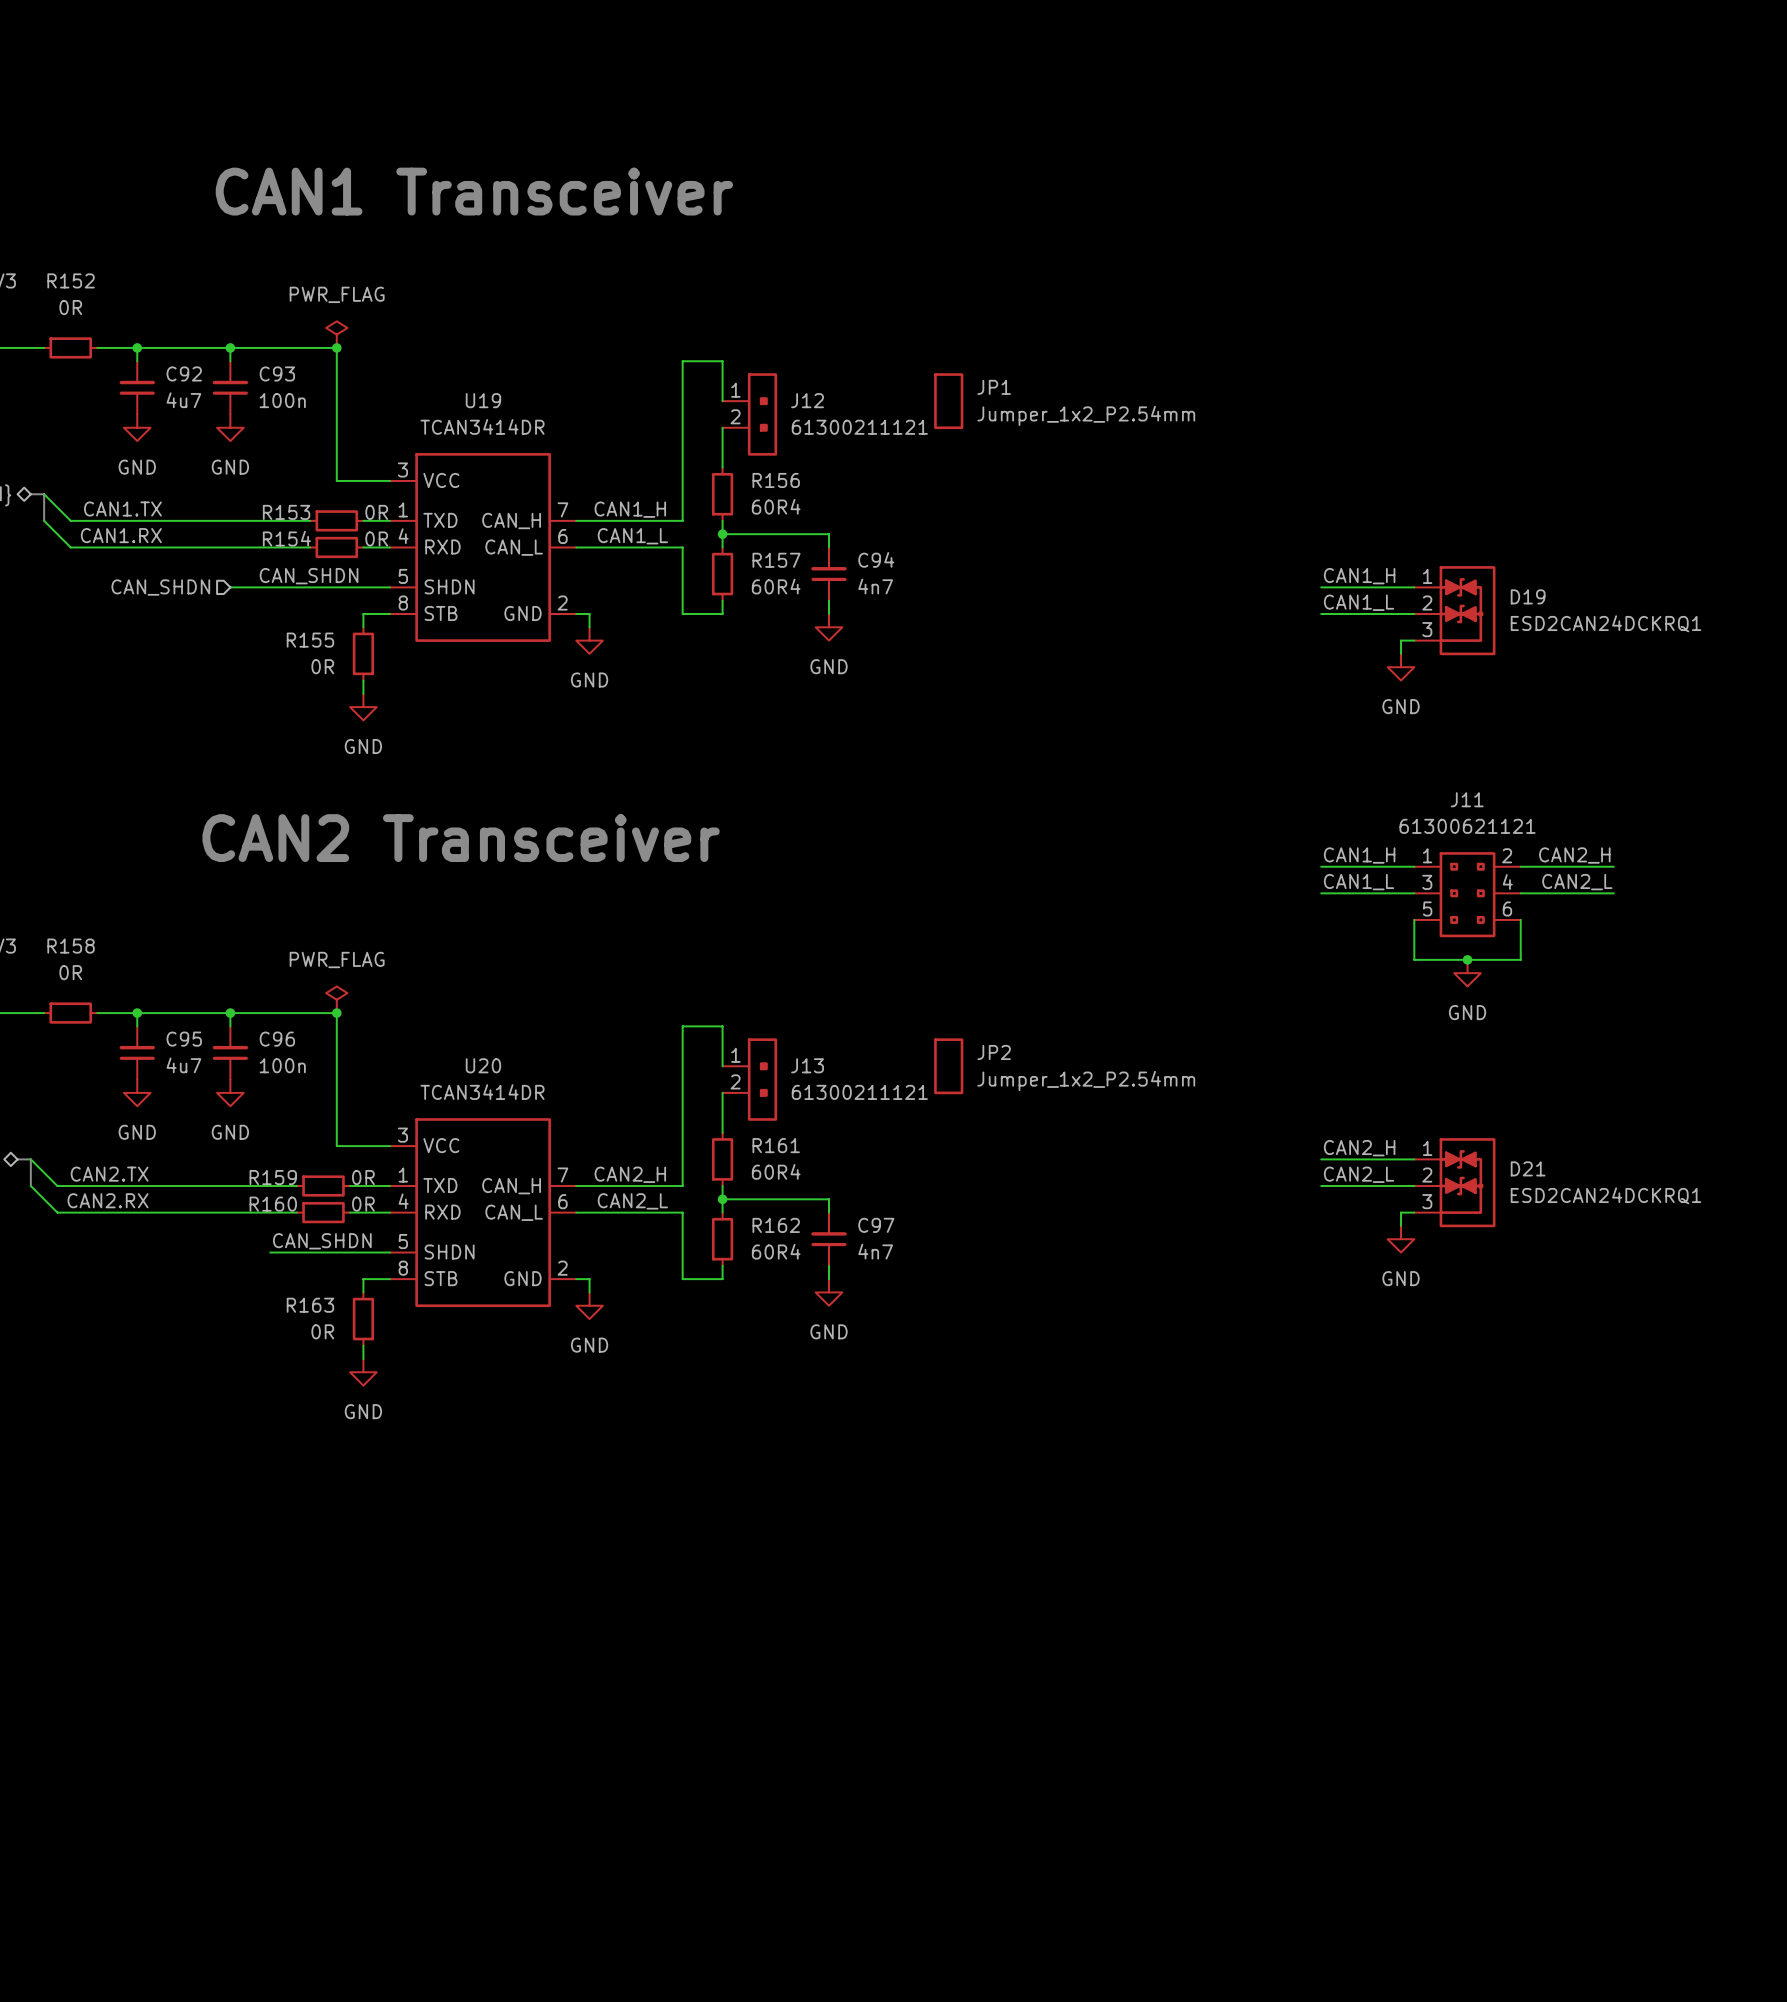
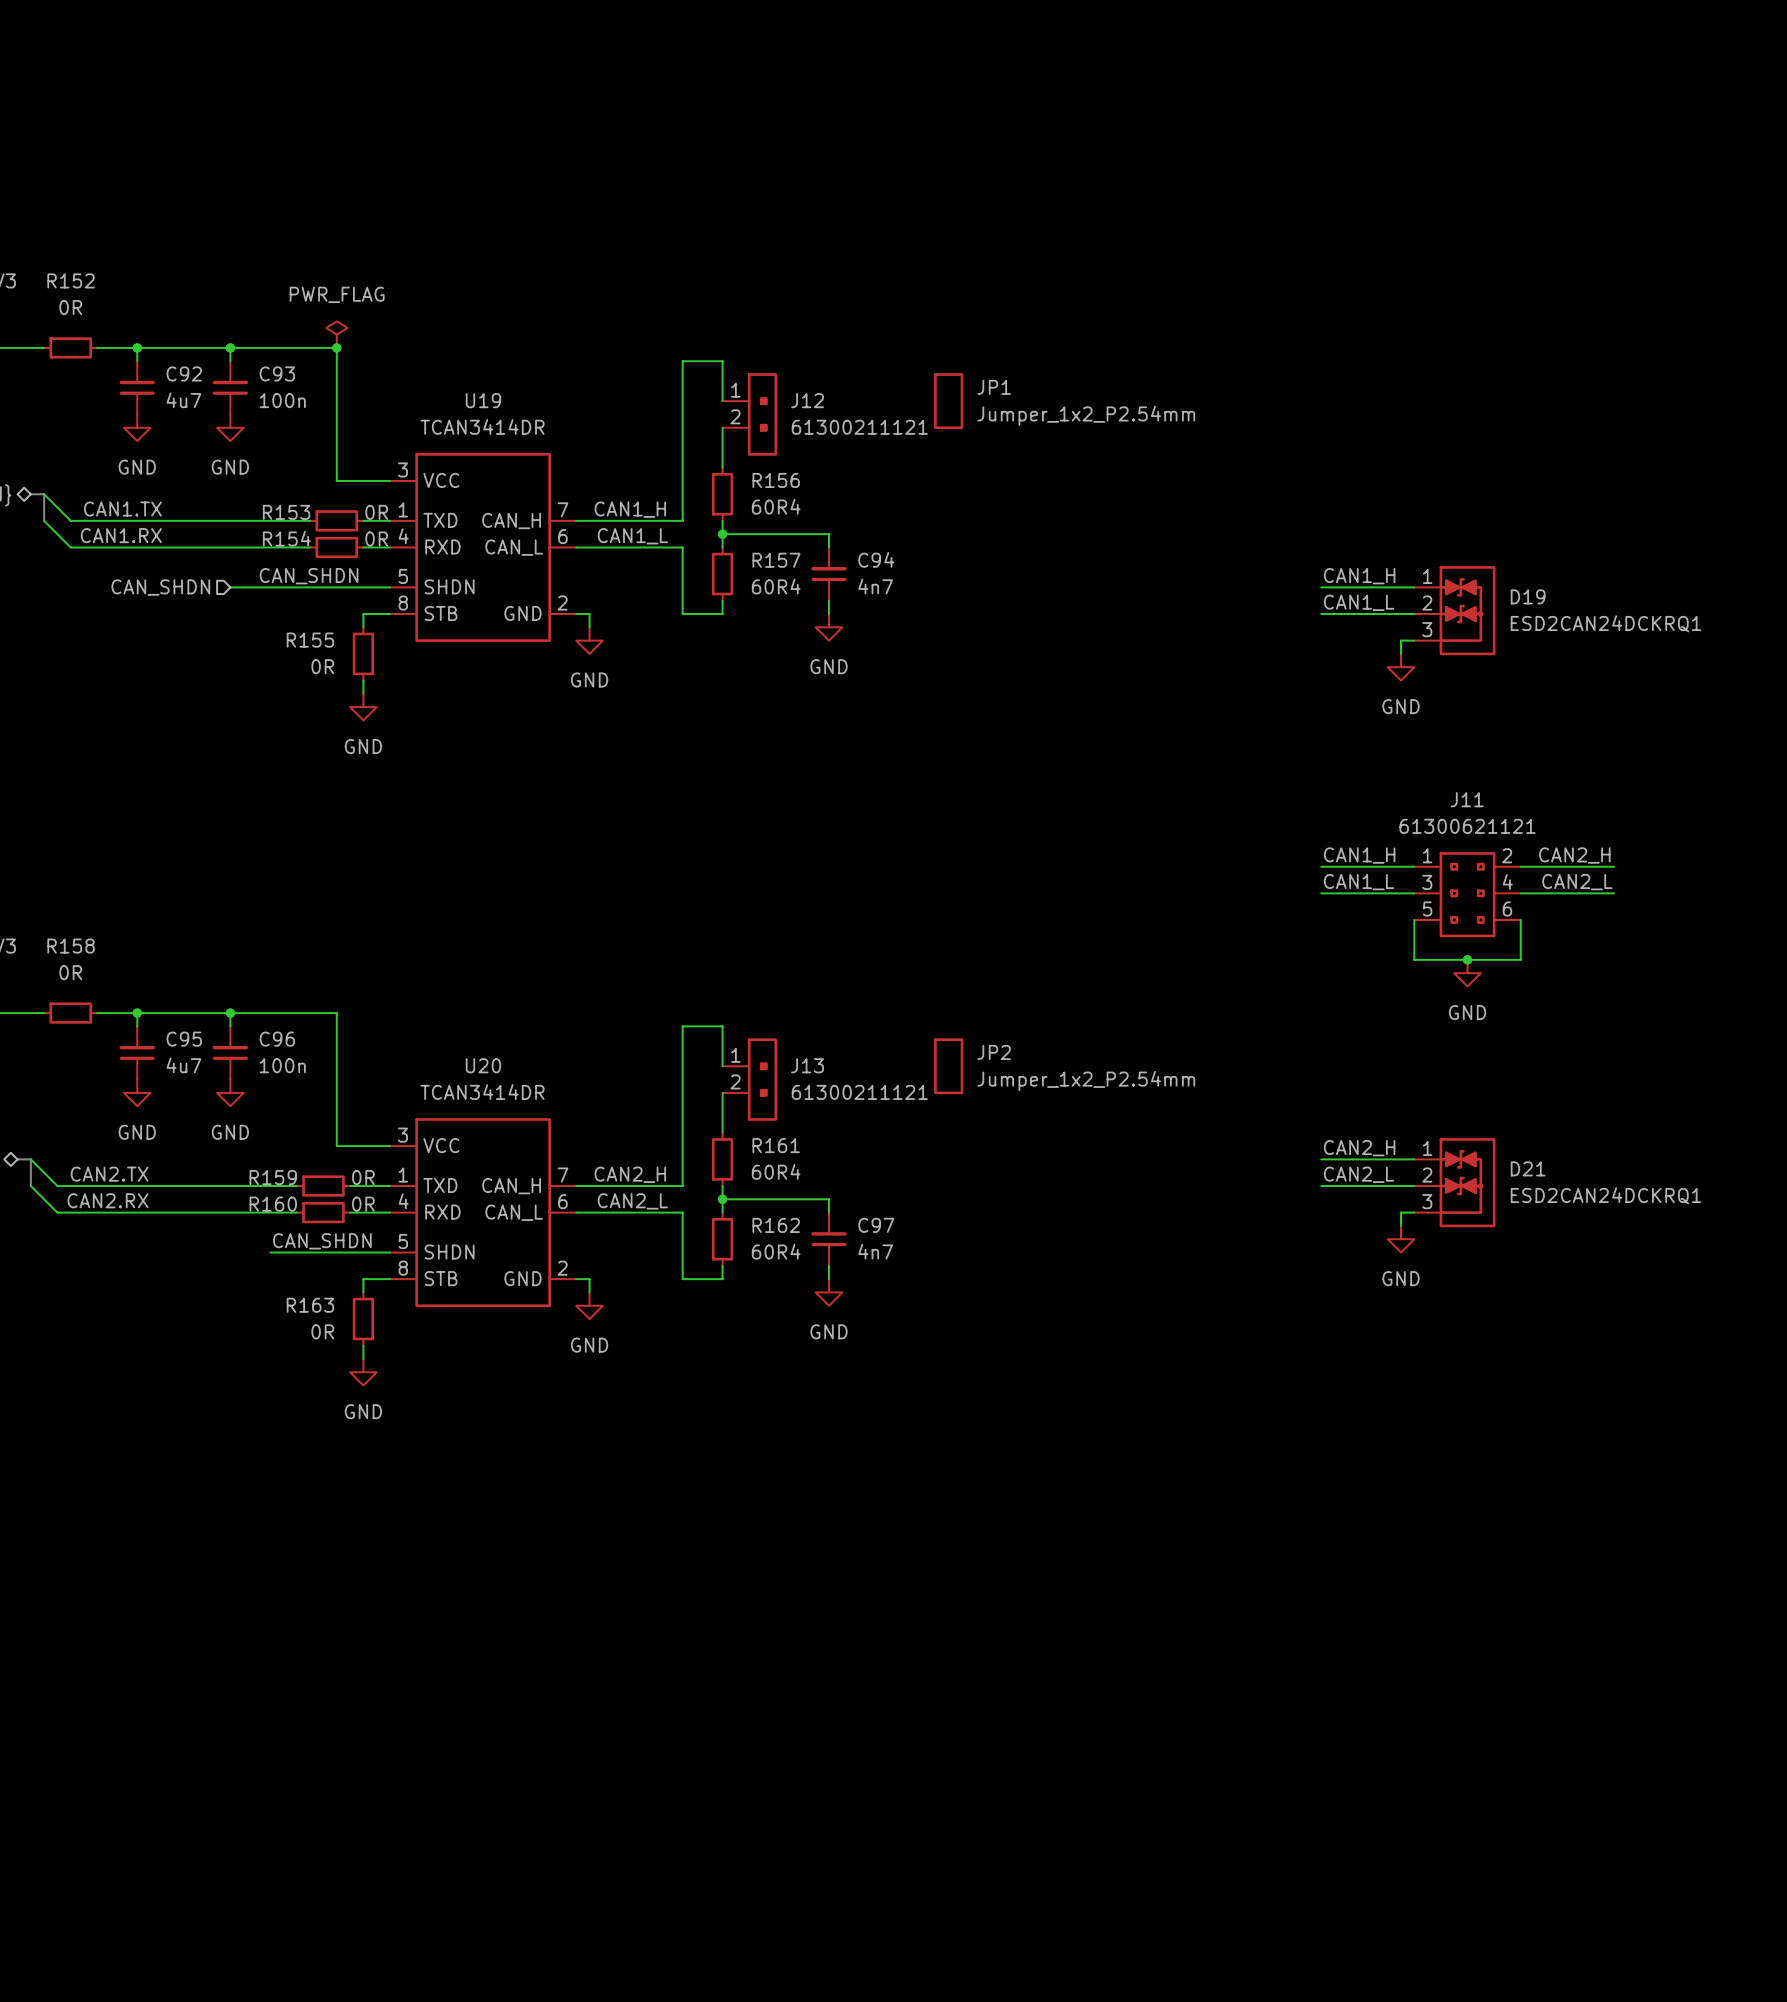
text: CAN1 Transceiver (474, 191) -> none
text: CAN2 Transceiver (461, 838) -> none
power symbol: PWR_FLAG (336, 999) -> none
junction: (336, 1013) -> none

